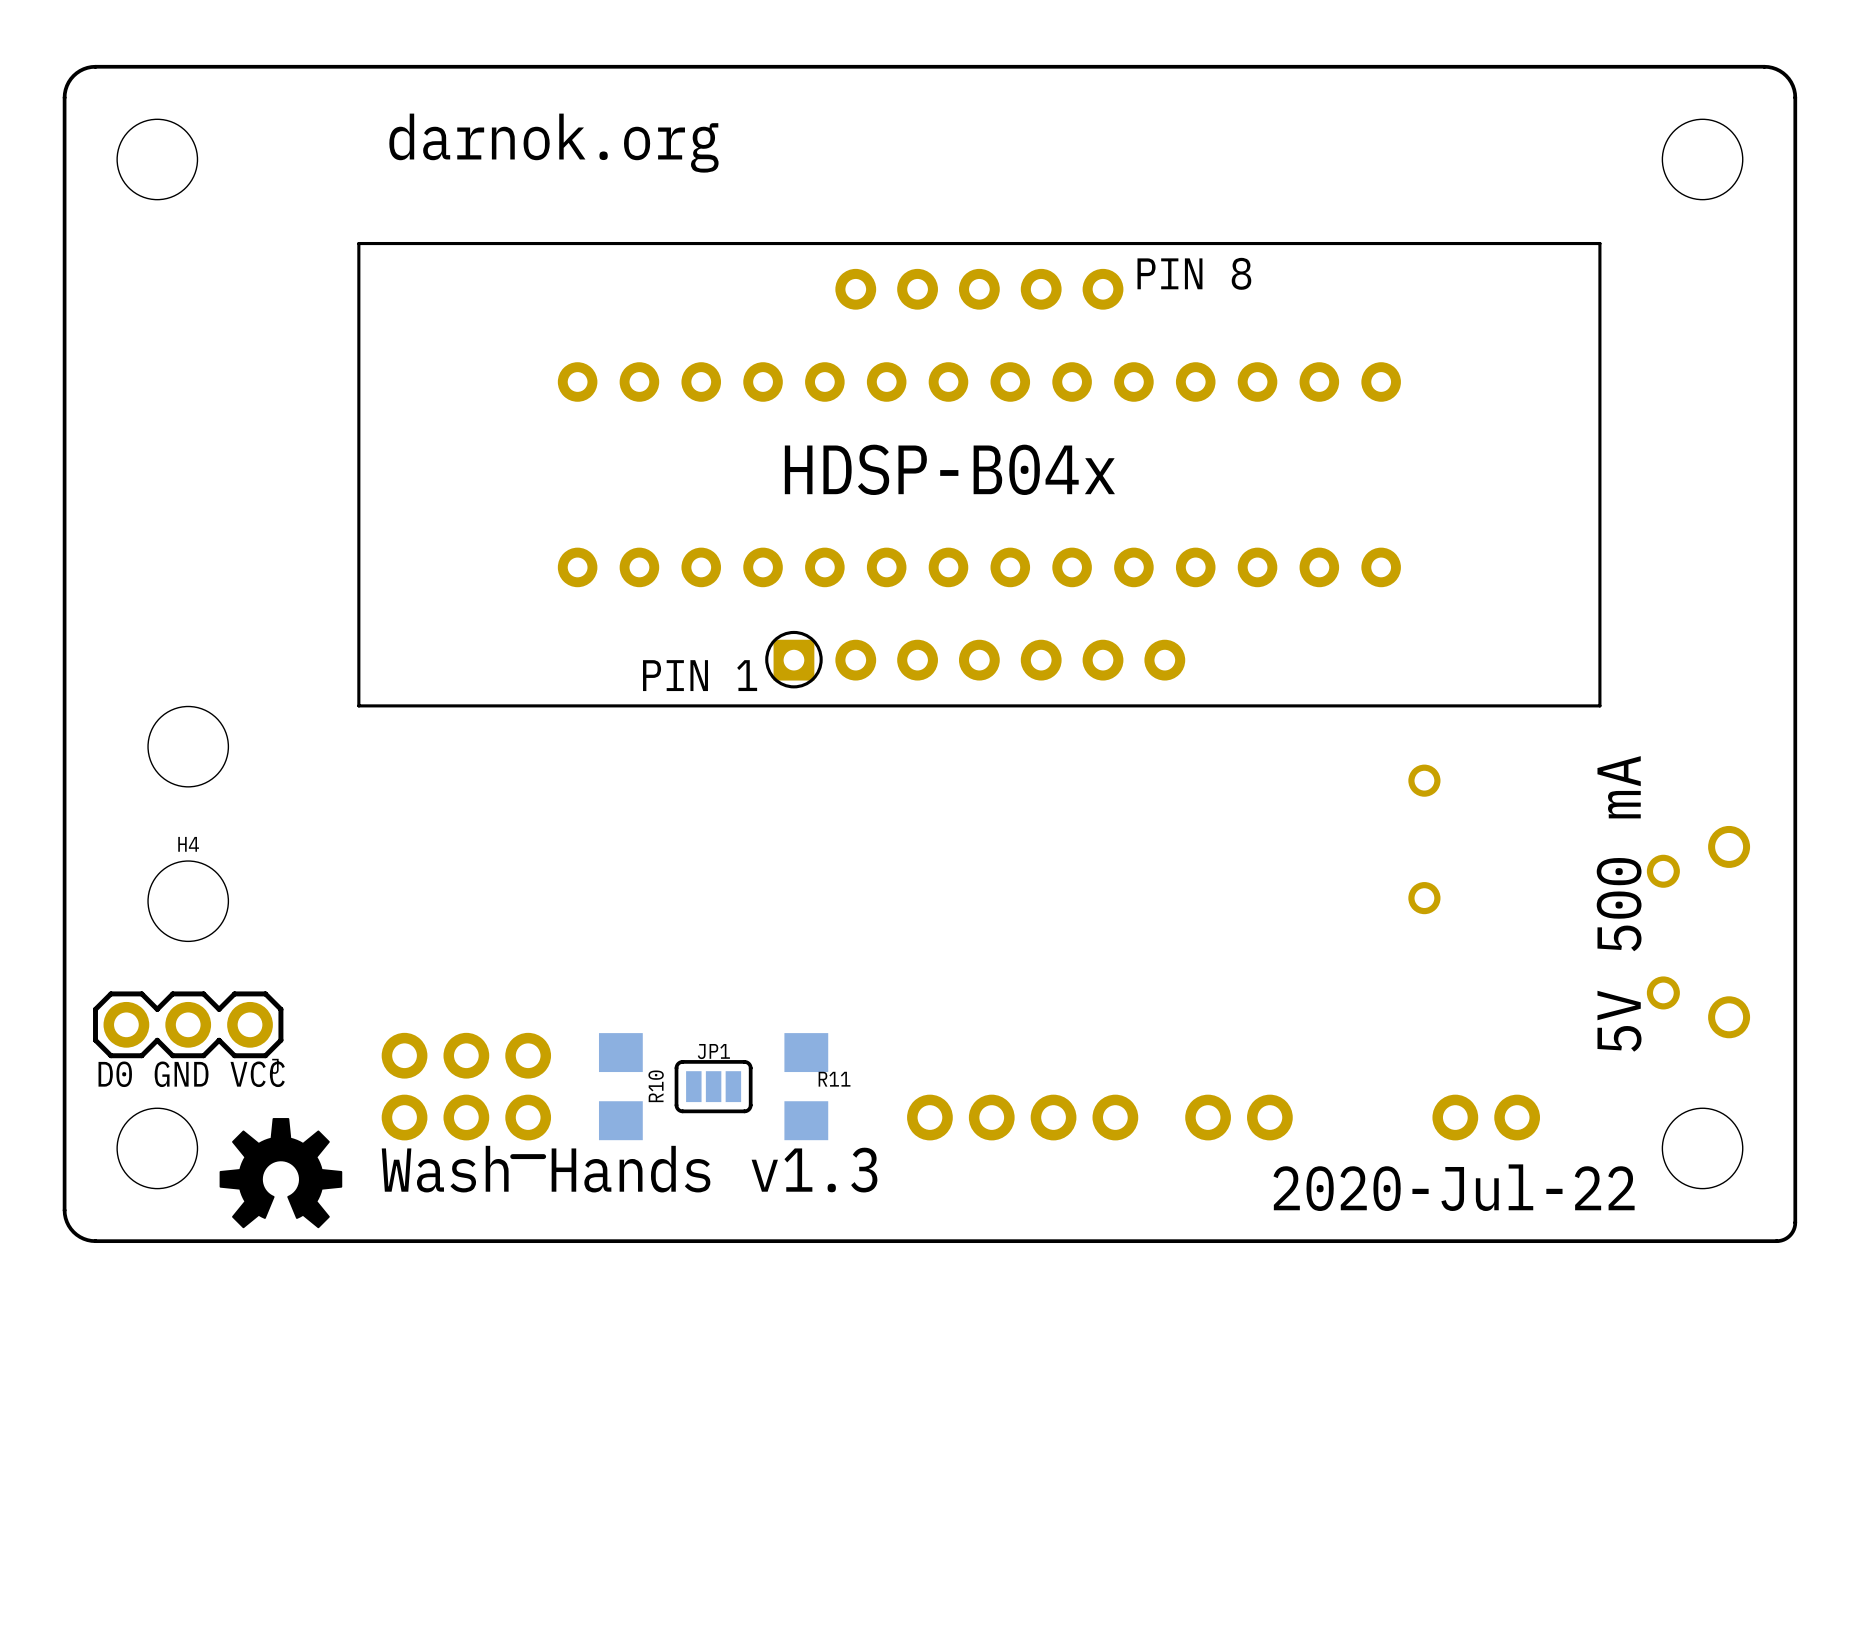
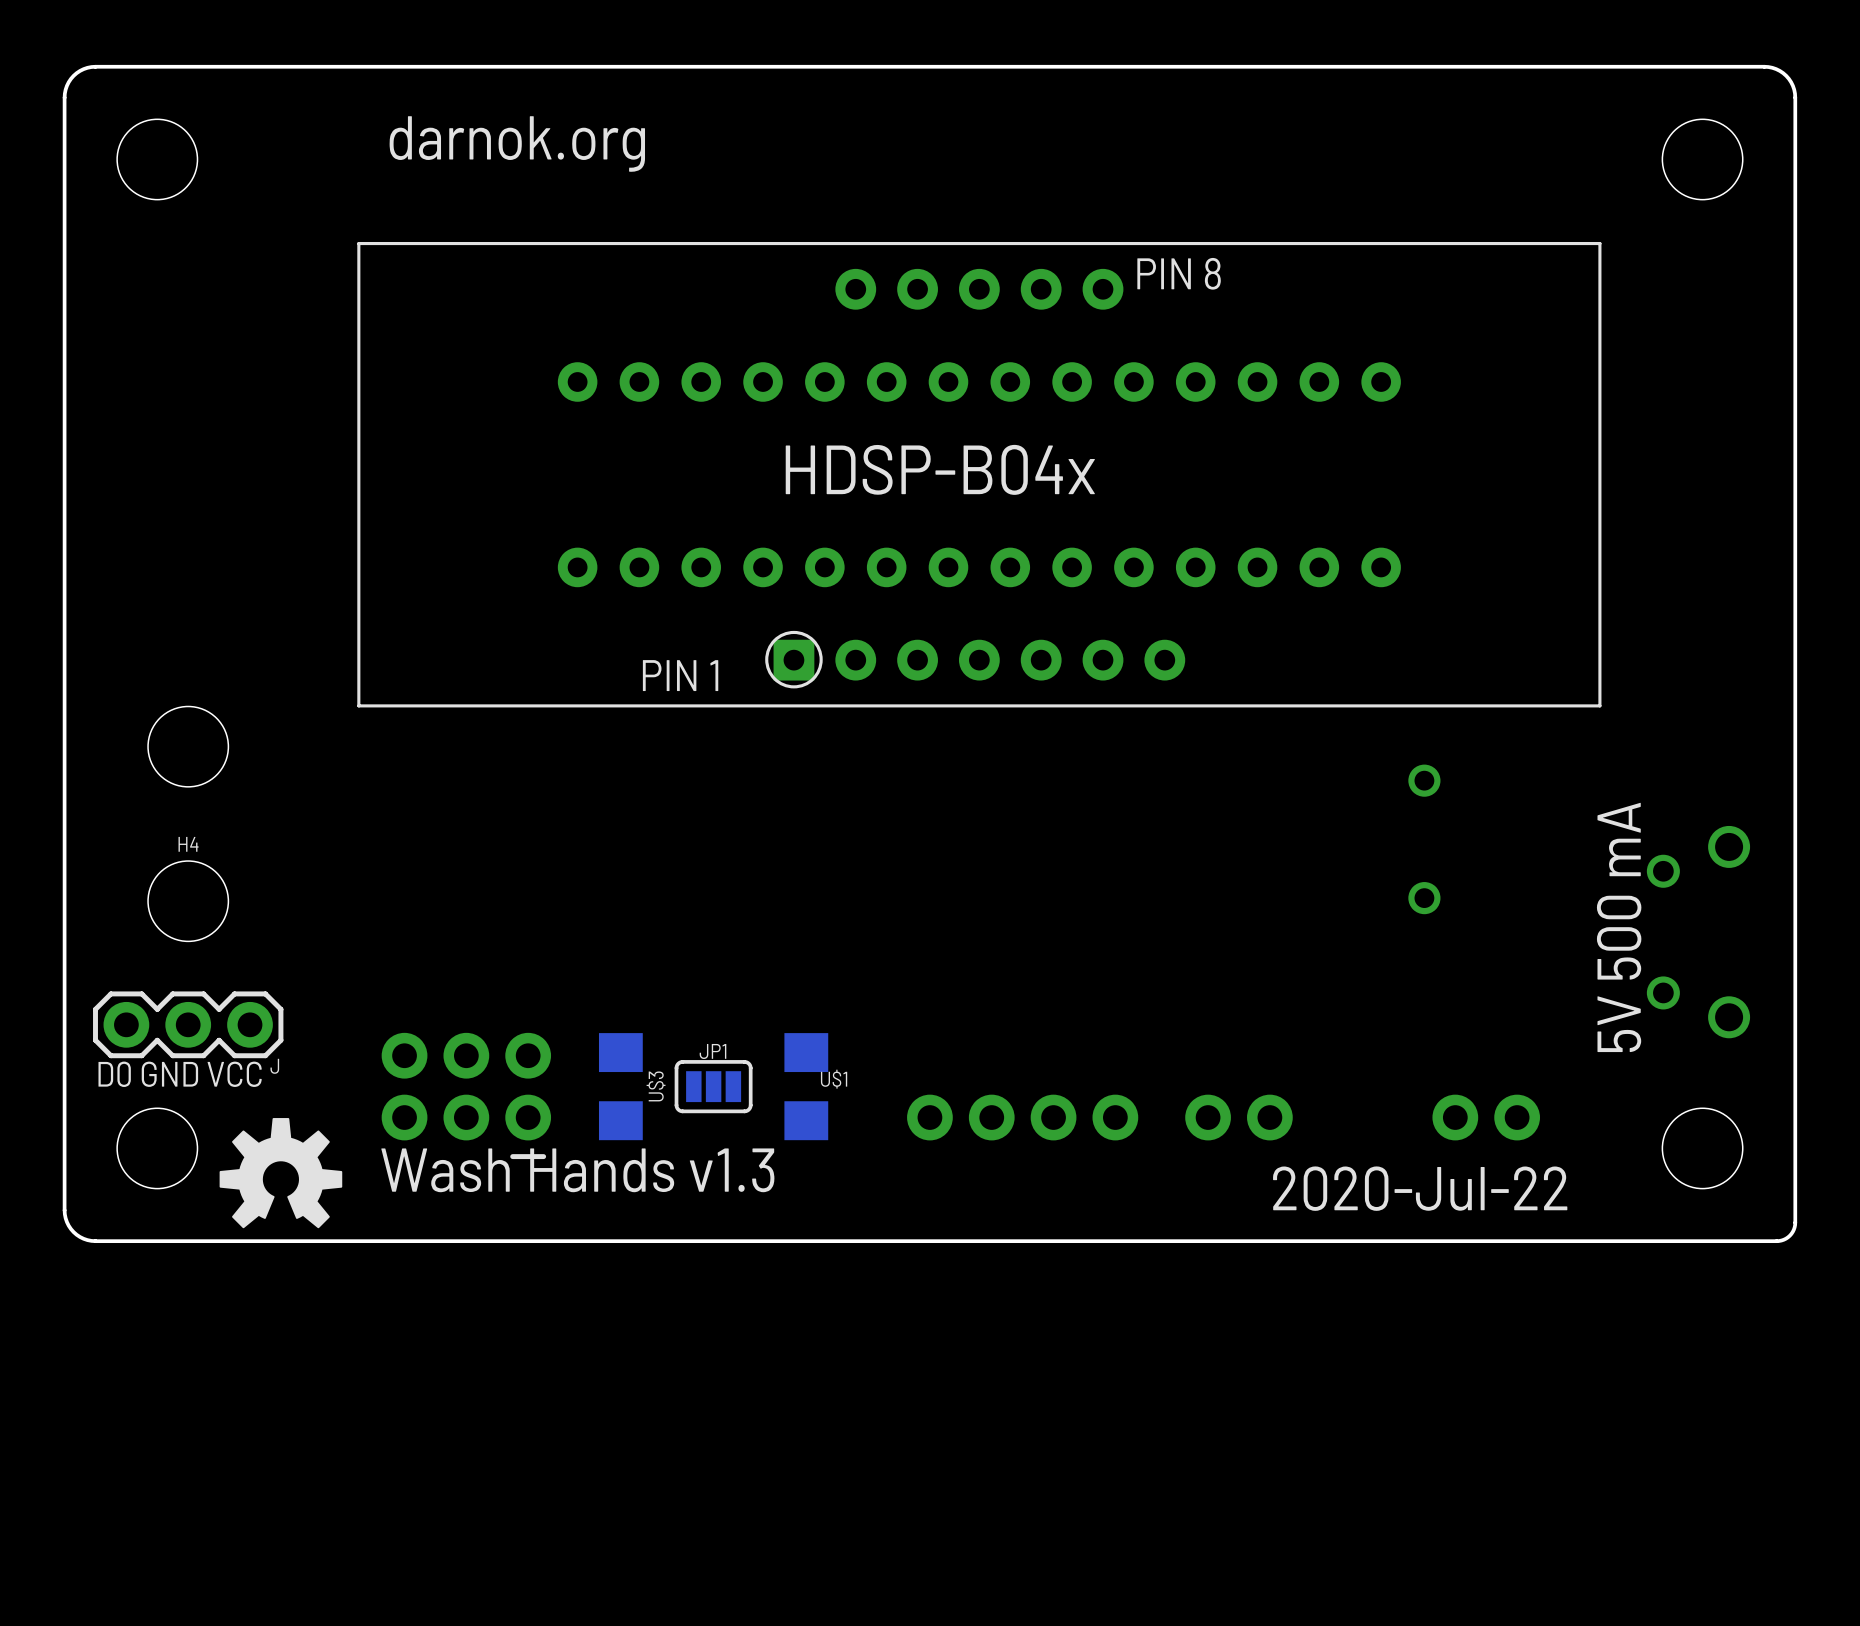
R11 name: R11 (834, 1079) -> U$1 (834, 1079)
R10 name: R10 (656, 1086) -> U$3 (656, 1086)

